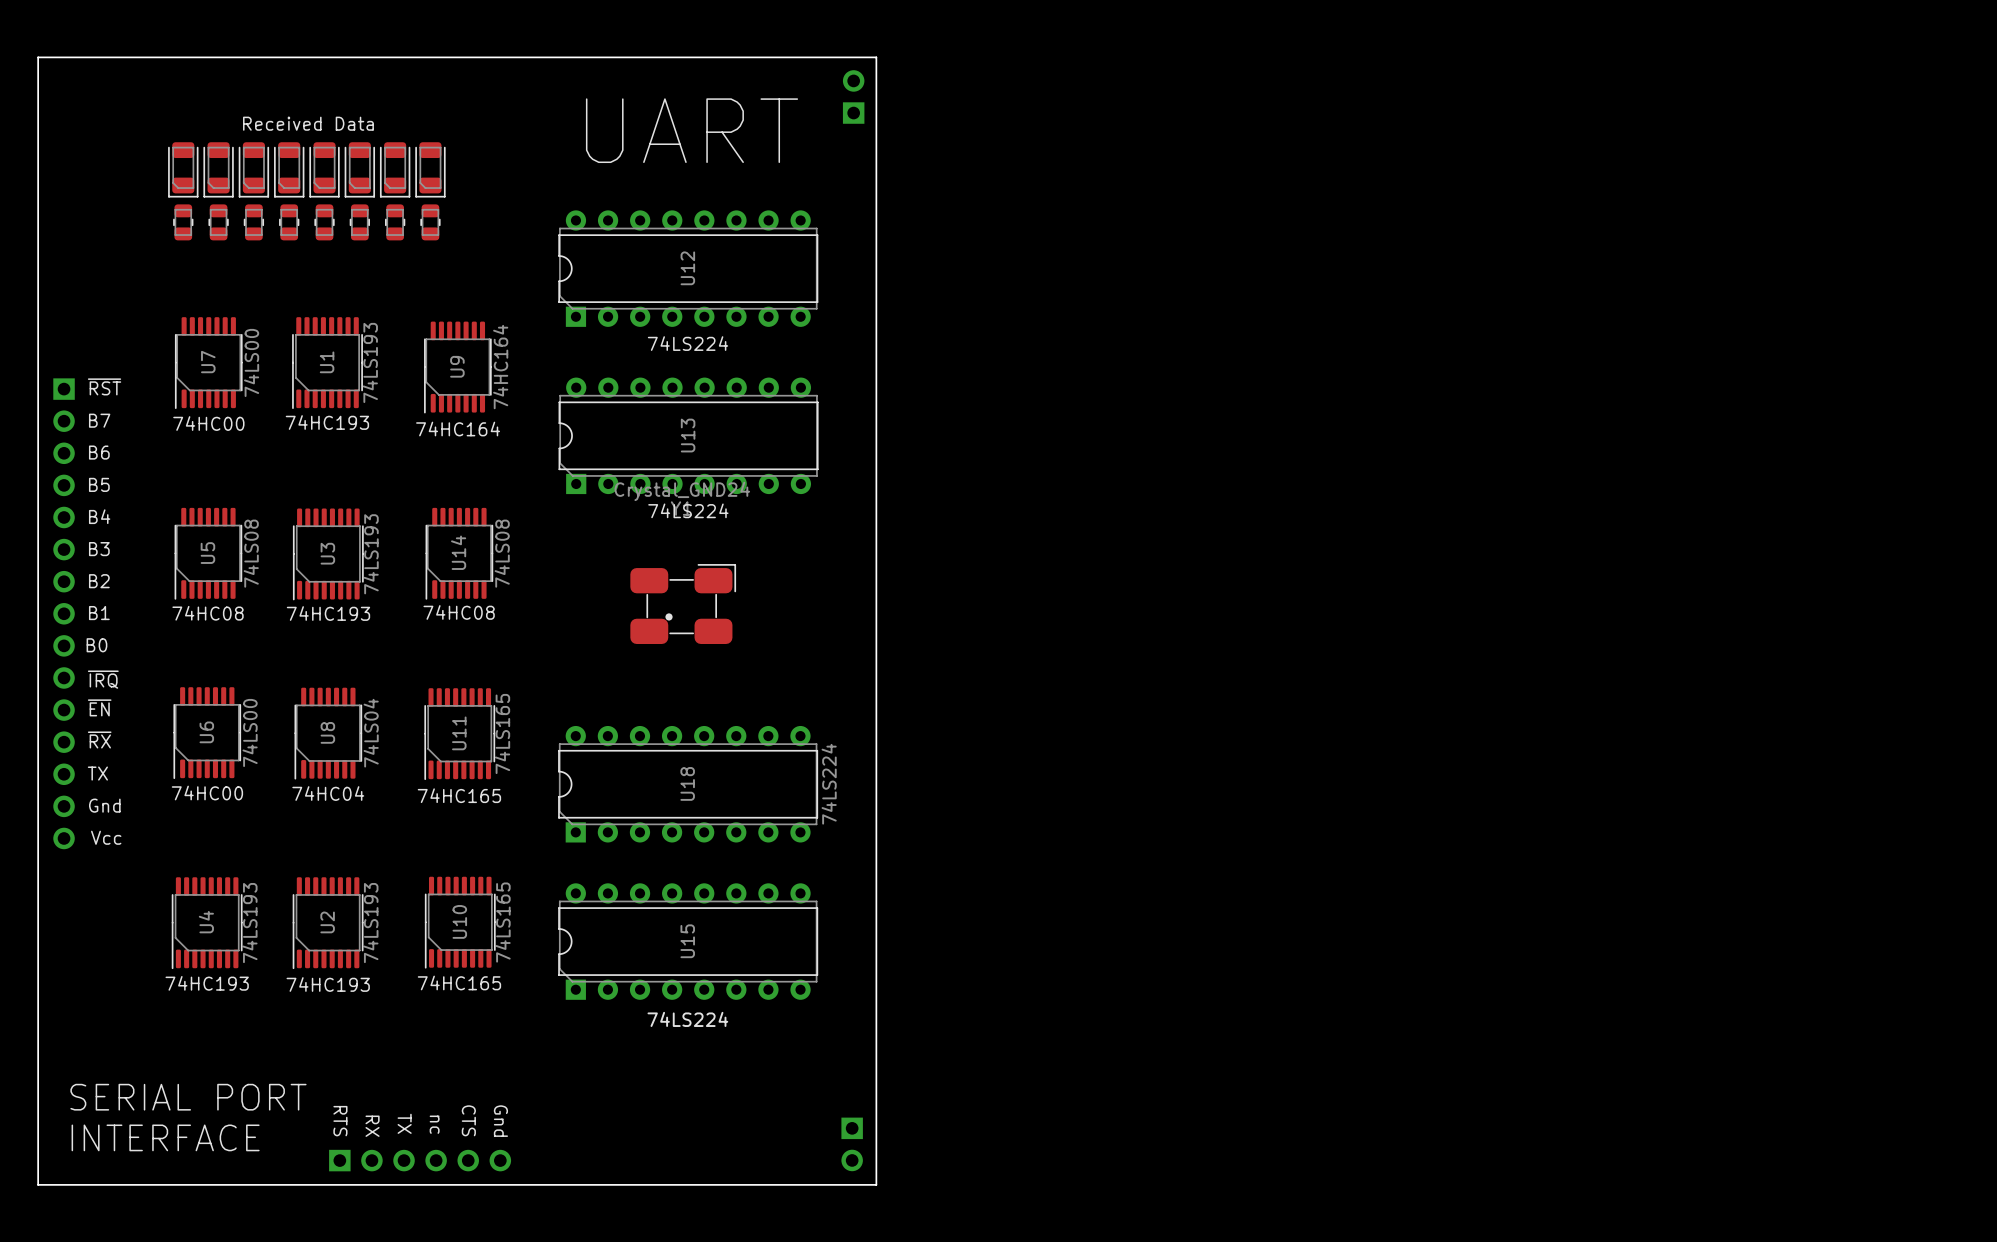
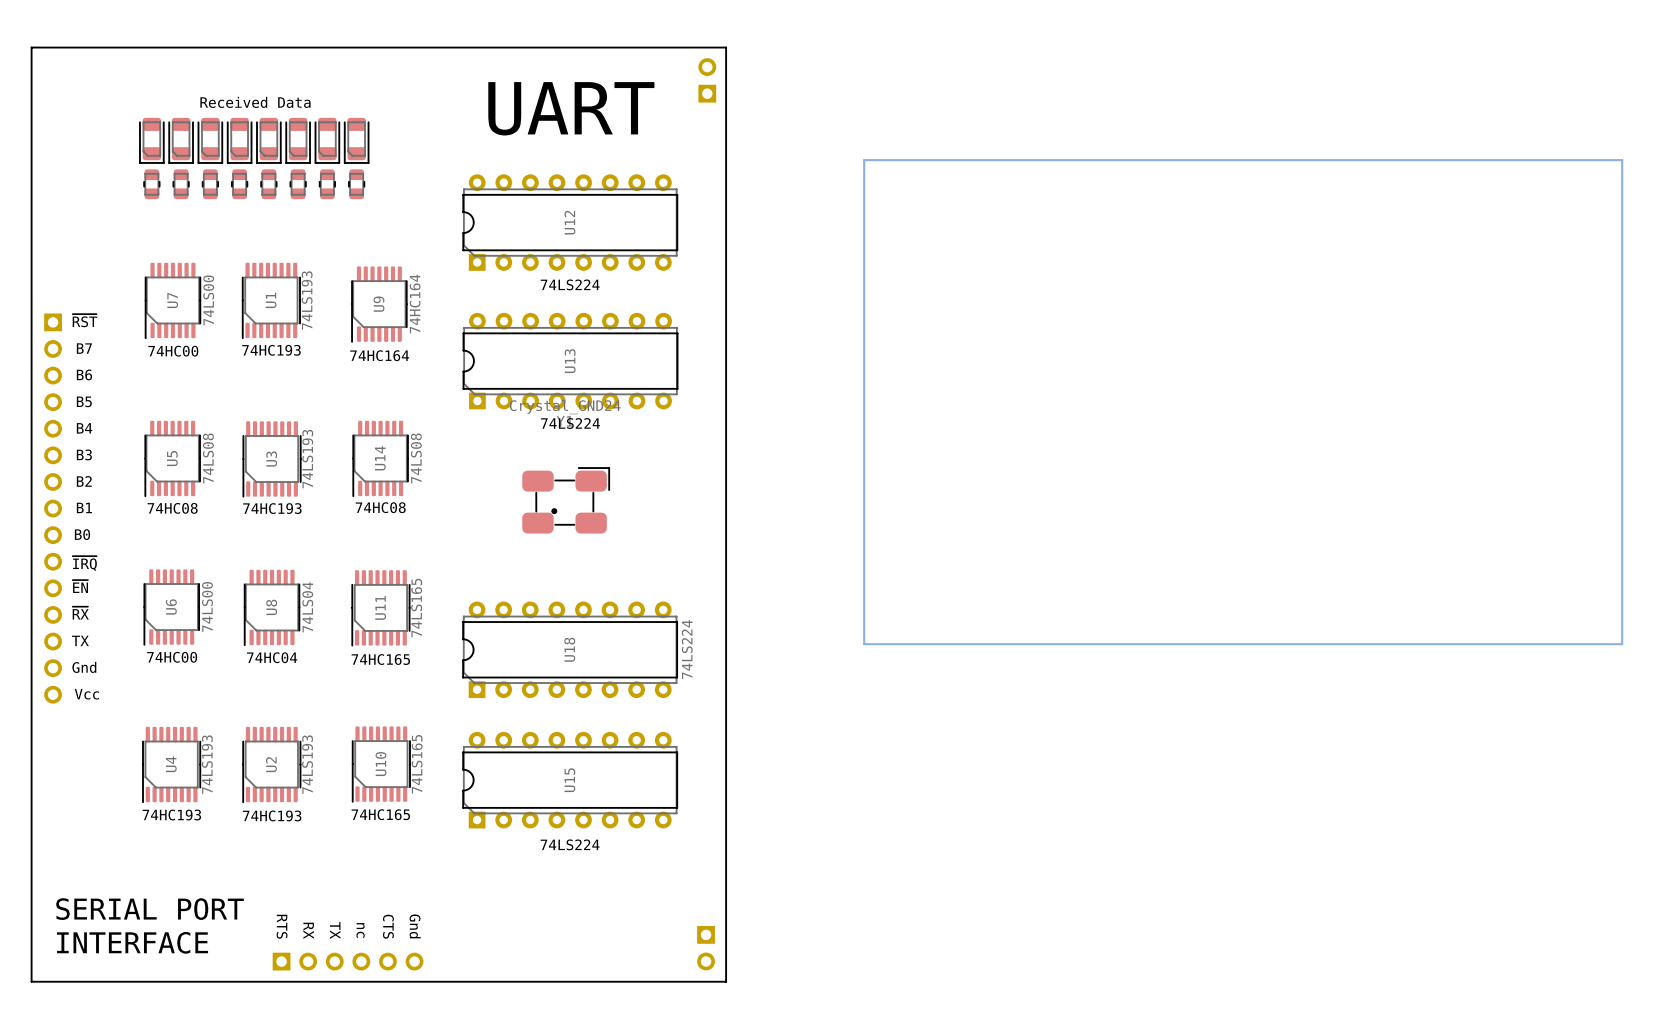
bottom track: none -> (864, 160) (1622, 160) (1622, 644) (864, 644) (864, 160)

